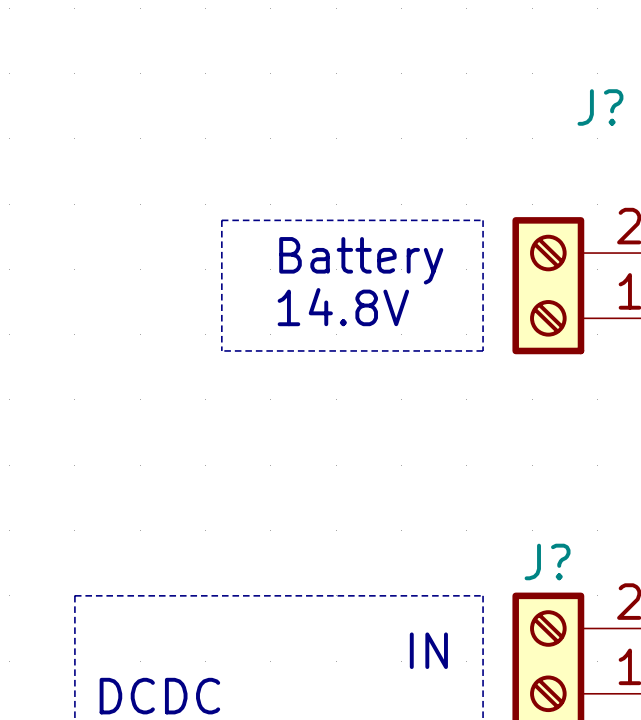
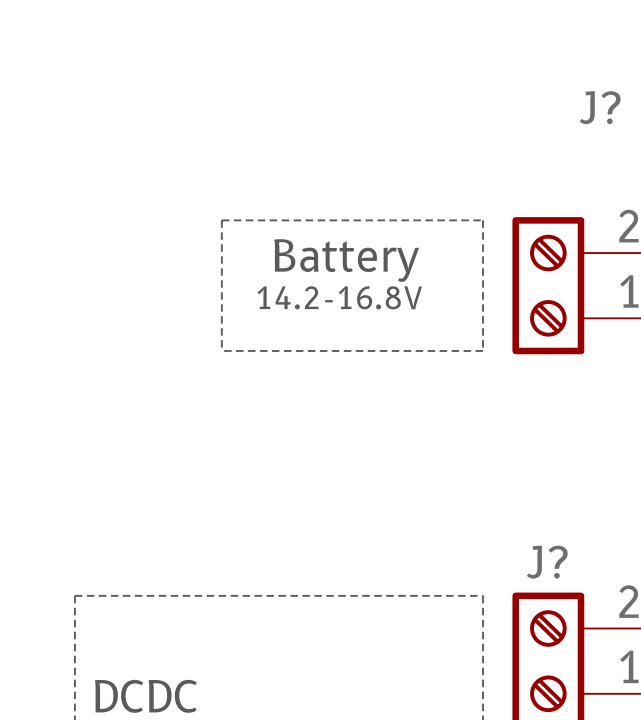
text: 14.8V (343, 307) -> 14.2-16.8V (339, 297)
text: IN (428, 650) -> none

